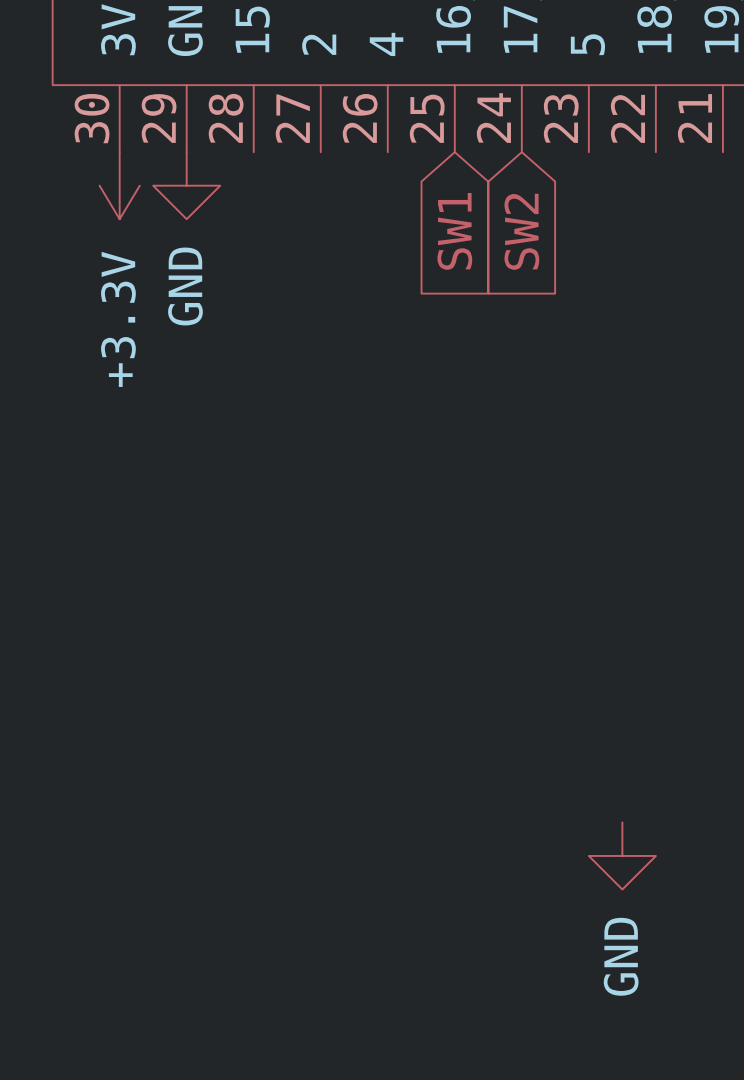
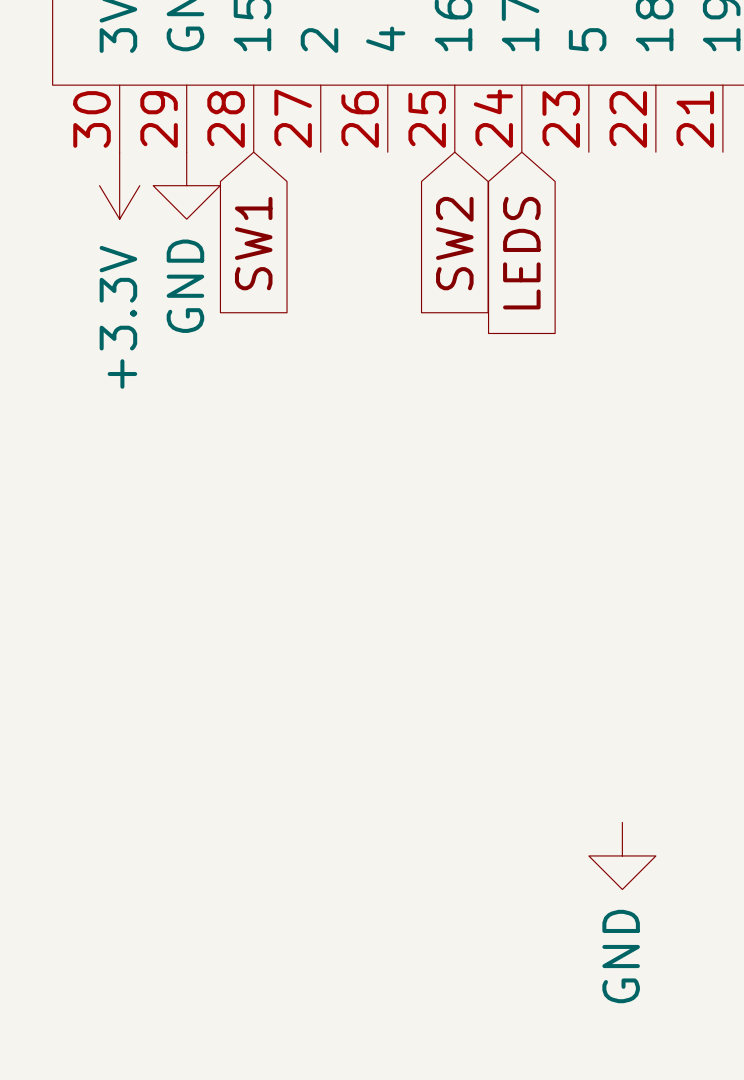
global label: none -> SW1 (253, 243)
global label: SW1 (454, 231) -> SW2 (454, 243)
global label: SW2 (521, 231) -> LEDS (521, 253)

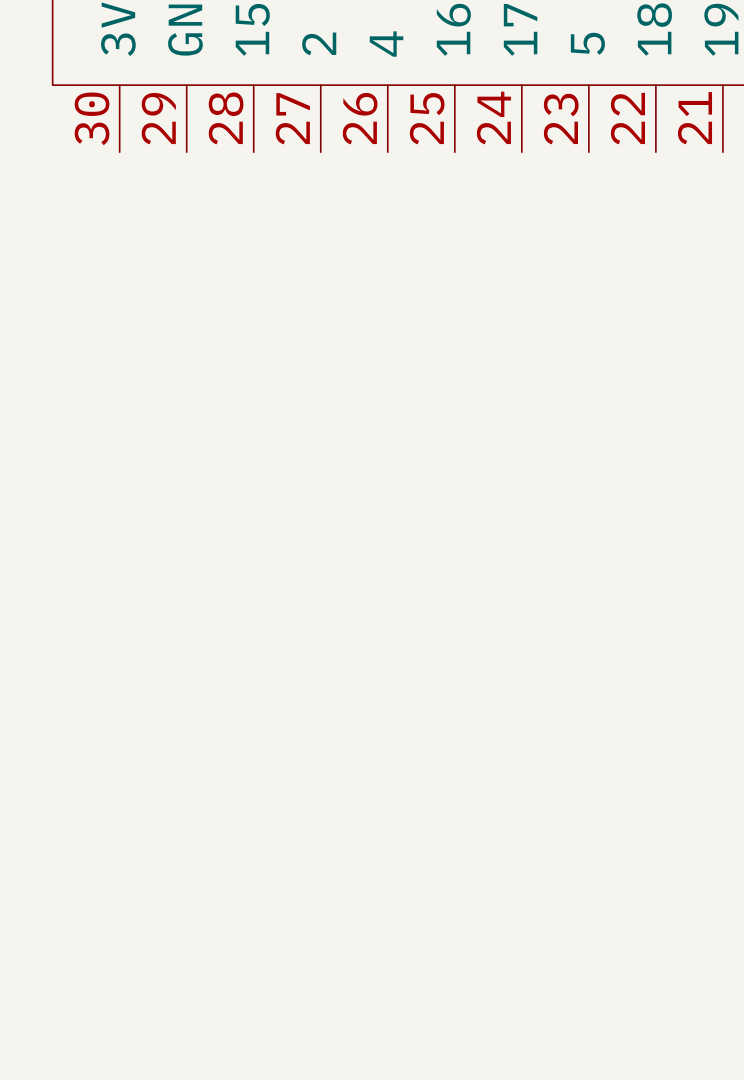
power symbol: +3.3V (119, 185) -> none
power symbol: GND (186, 185) -> none
global label: SW1 (253, 243) -> none
global label: SW2 (454, 243) -> none
global label: LEDS (521, 253) -> none
power symbol: GND (622, 855) -> none

